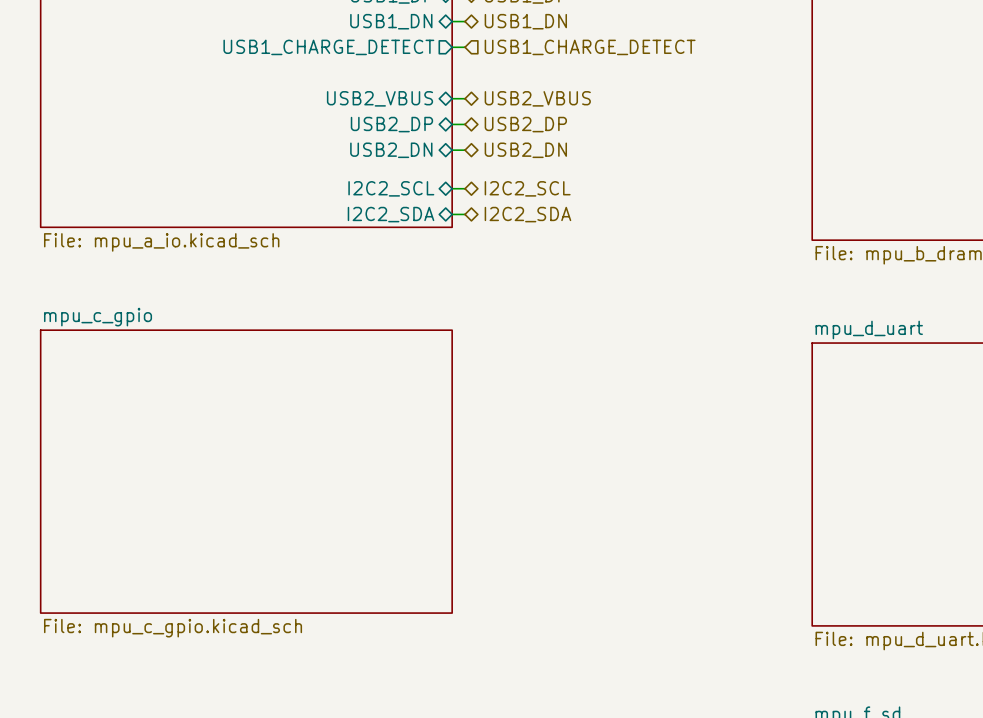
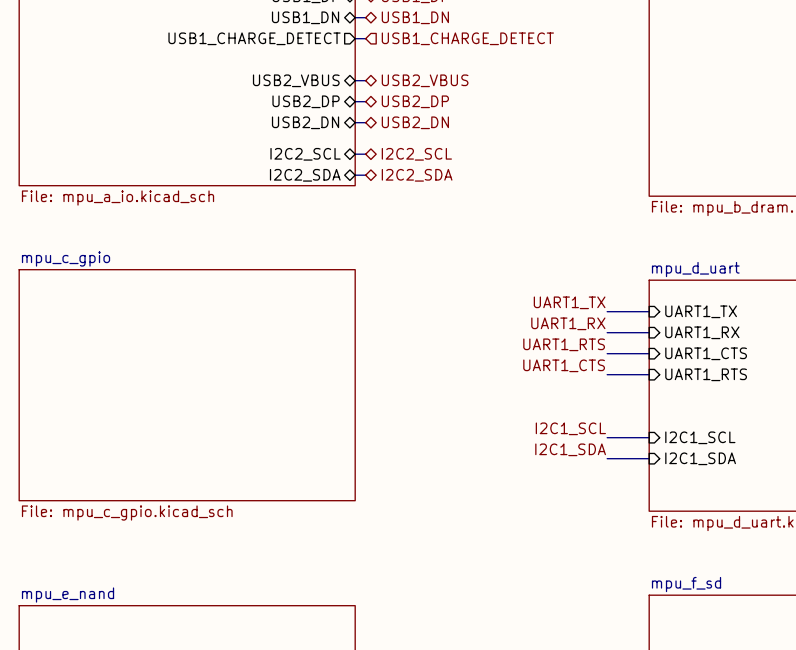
label: none -> UART1_TX (569, 302)
wire: none -> (607, 311) (649, 311)
sheet pin: none -> UART1_TX (701, 311)
label: none -> UART1_RX (568, 323)
wire: none -> (607, 332) (649, 332)
sheet pin: none -> UART1_RX (702, 332)
label: none -> UART1_RTS (564, 344)
wire: none -> (607, 353) (649, 353)
sheet pin: none -> UART1_CTS (706, 353)
label: none -> UART1_CTS (564, 365)
wire: none -> (607, 374) (649, 374)
sheet pin: none -> UART1_RTS (706, 374)
label: none -> I2C1_SCL (570, 428)
wire: none -> (607, 437) (649, 437)
sheet pin: none -> I2C1_SCL (700, 437)
label: none -> I2C1_SDA (570, 449)
wire: none -> (607, 458) (649, 458)
sheet pin: none -> I2C1_SDA (700, 458)

